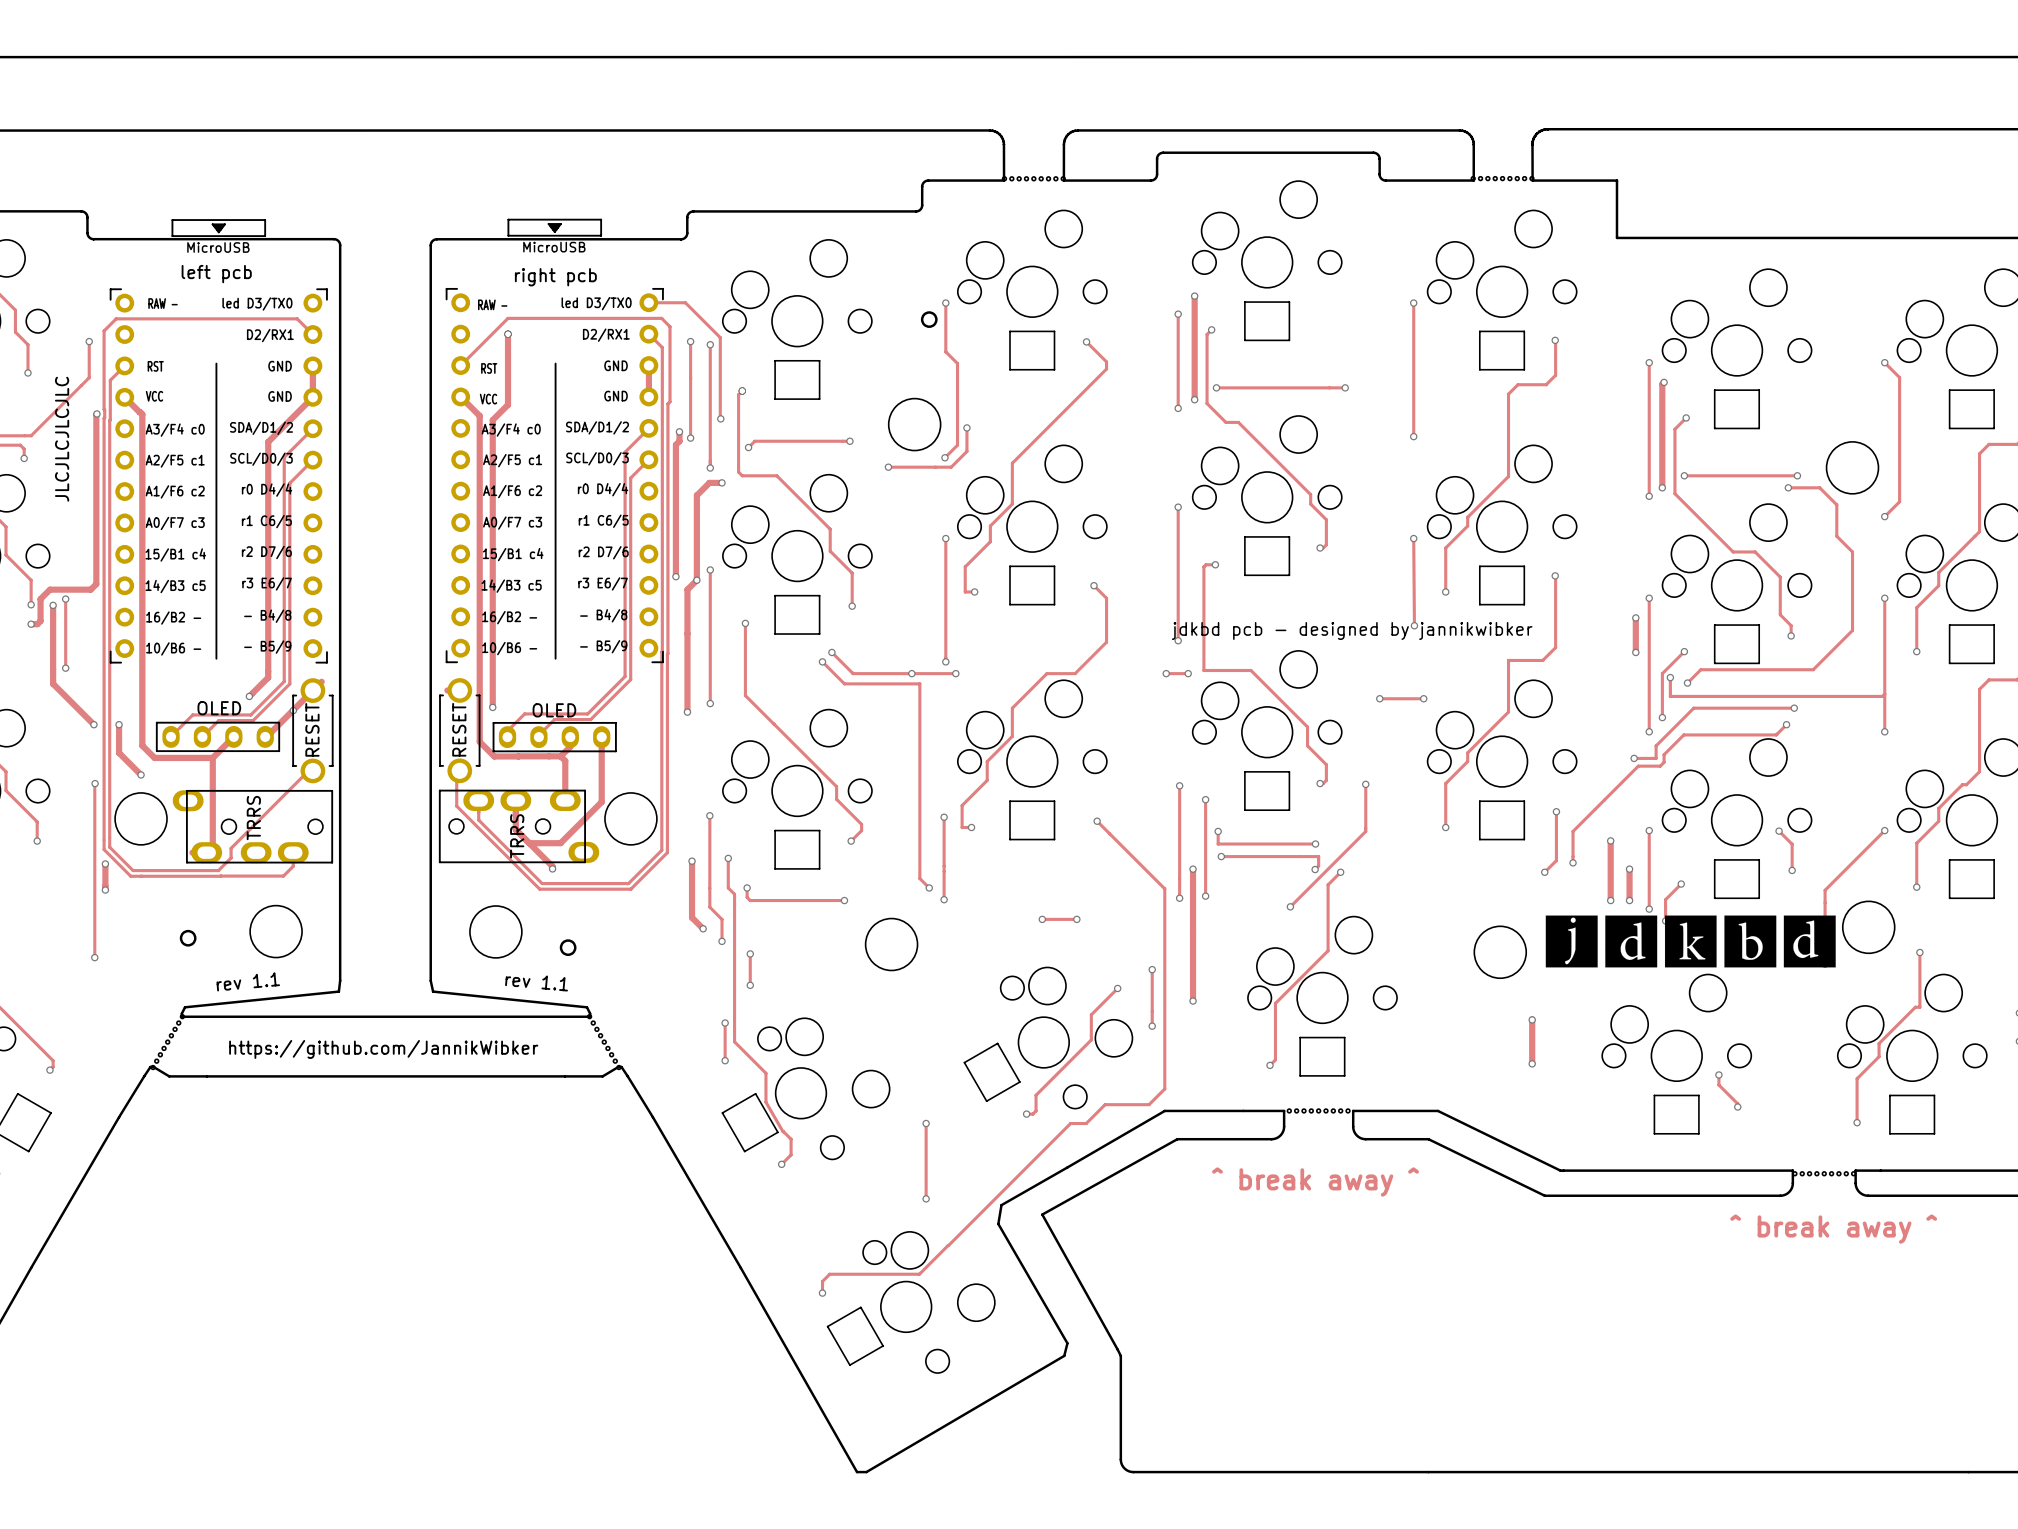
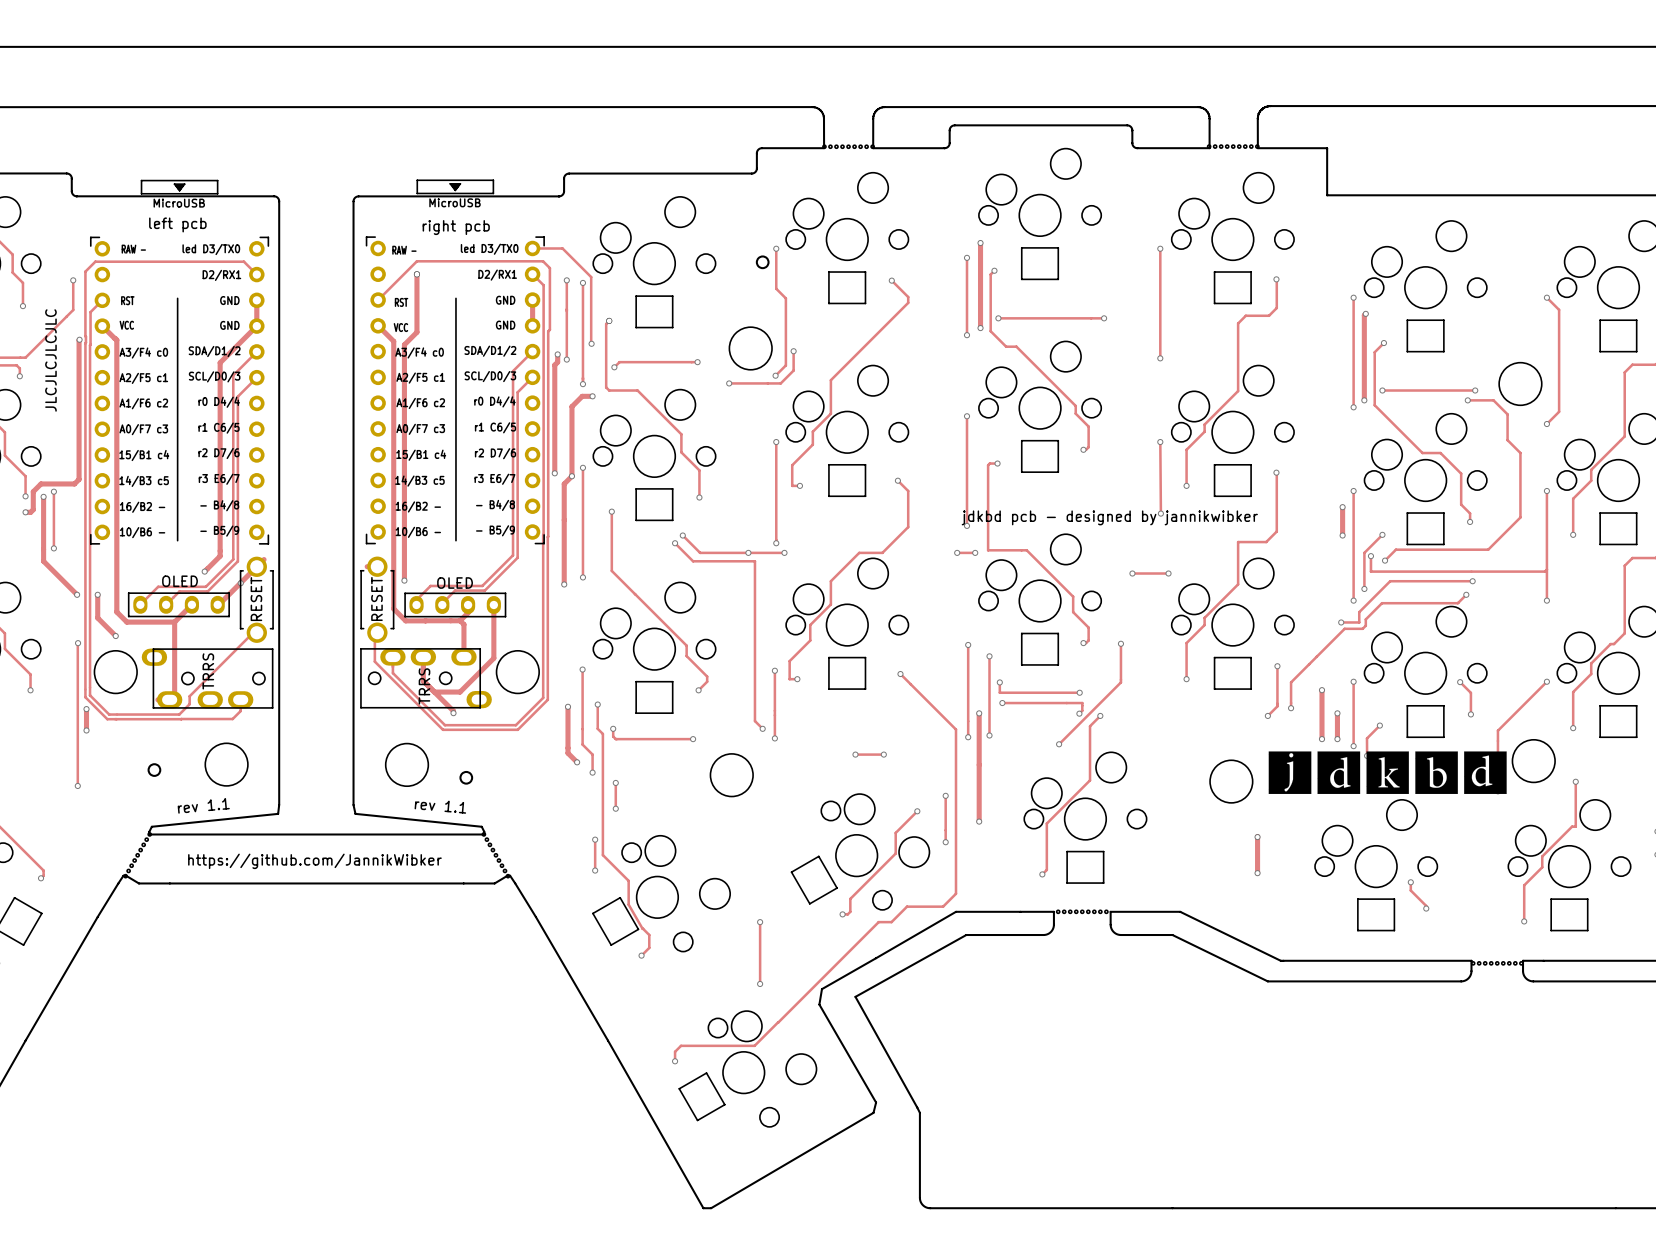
text: ^ break away ^ (1315, 1181) -> none
text: ^ break away ^ (1833, 1229) -> none

